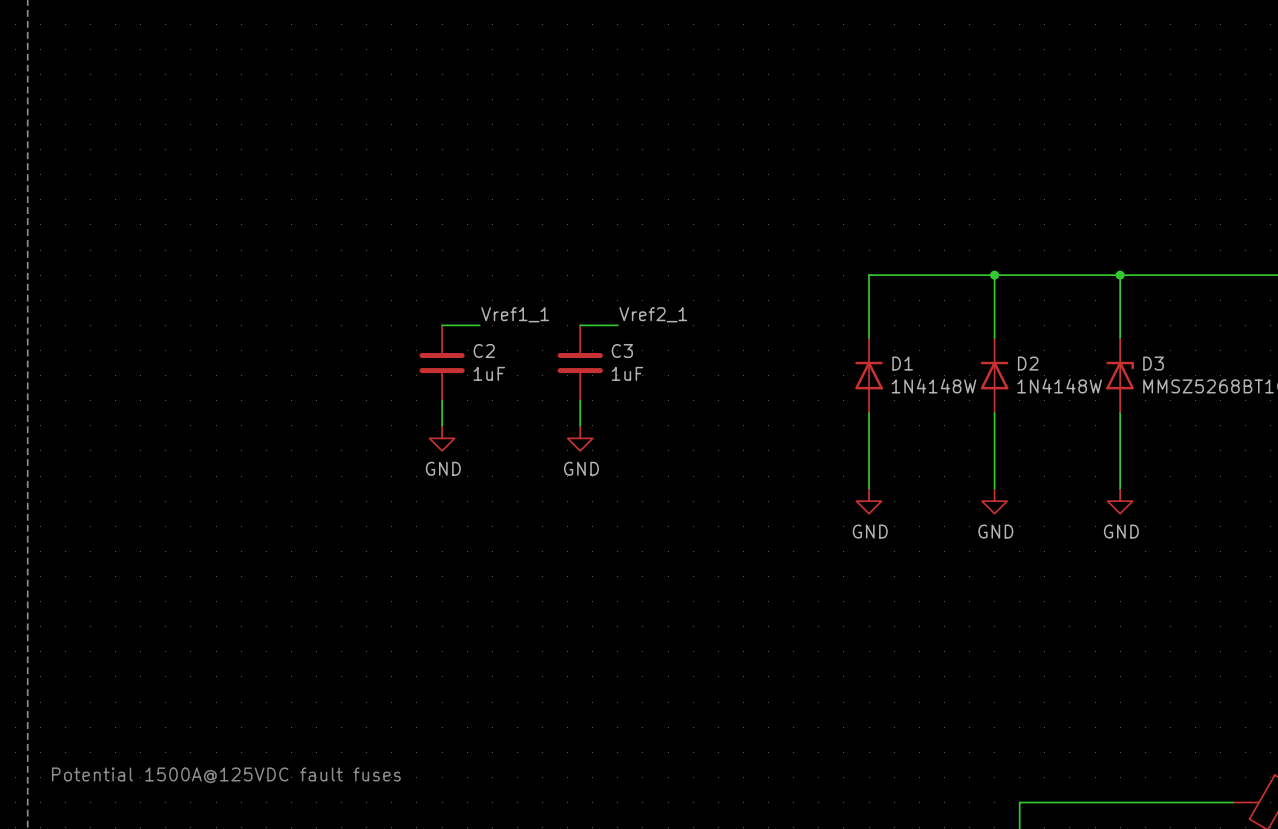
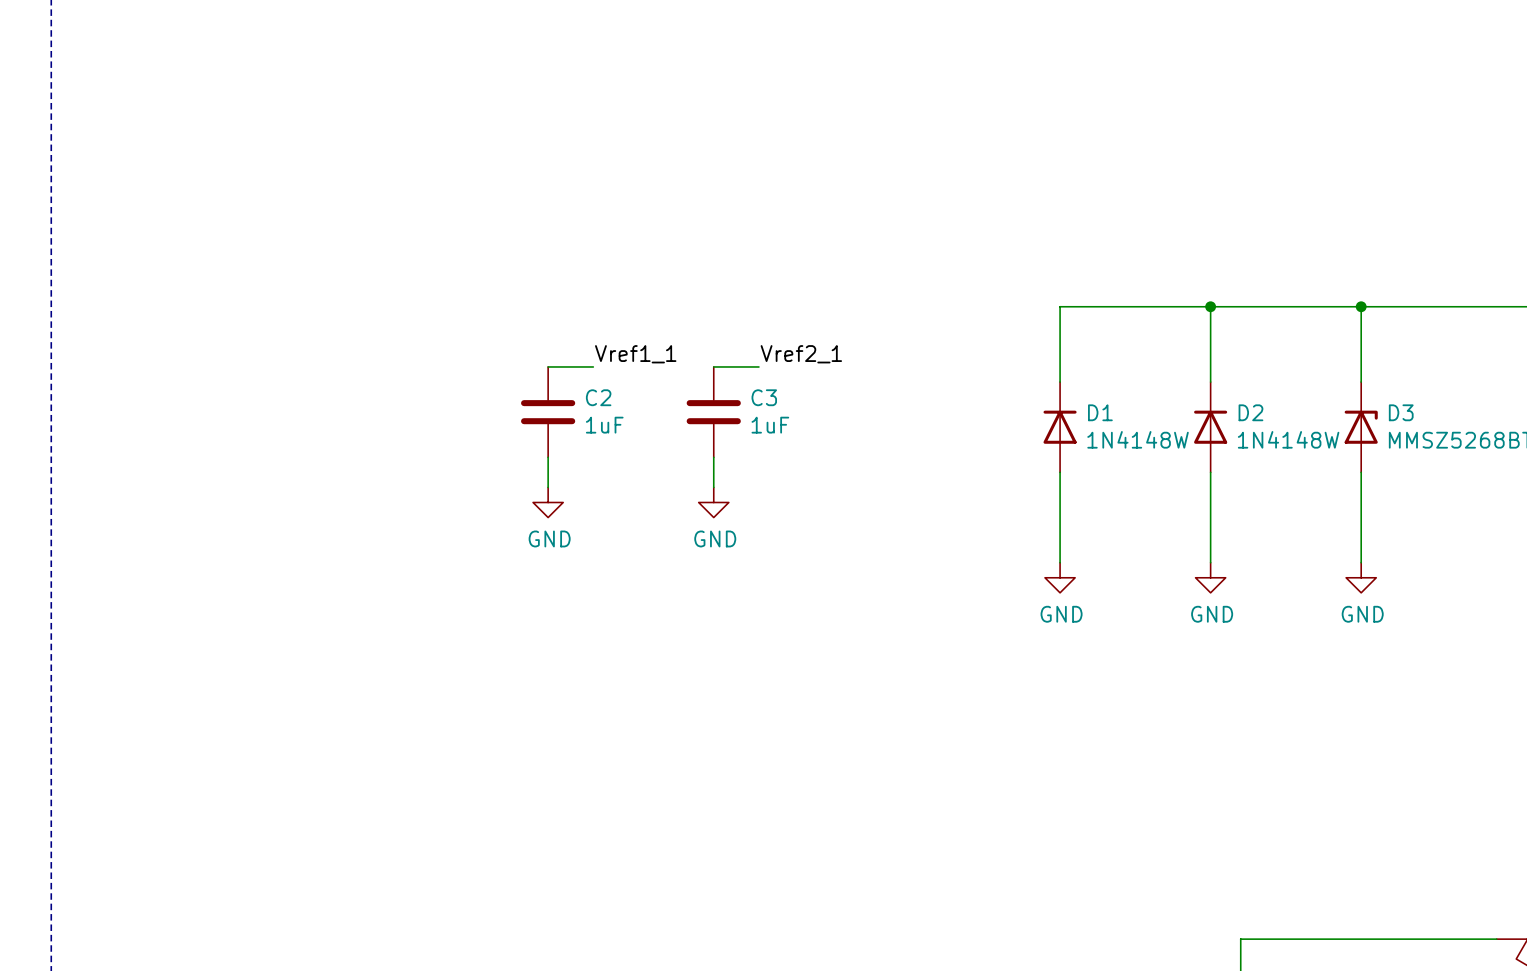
text: Potential 1500A@125VDC fault fuses (226, 775) -> none

